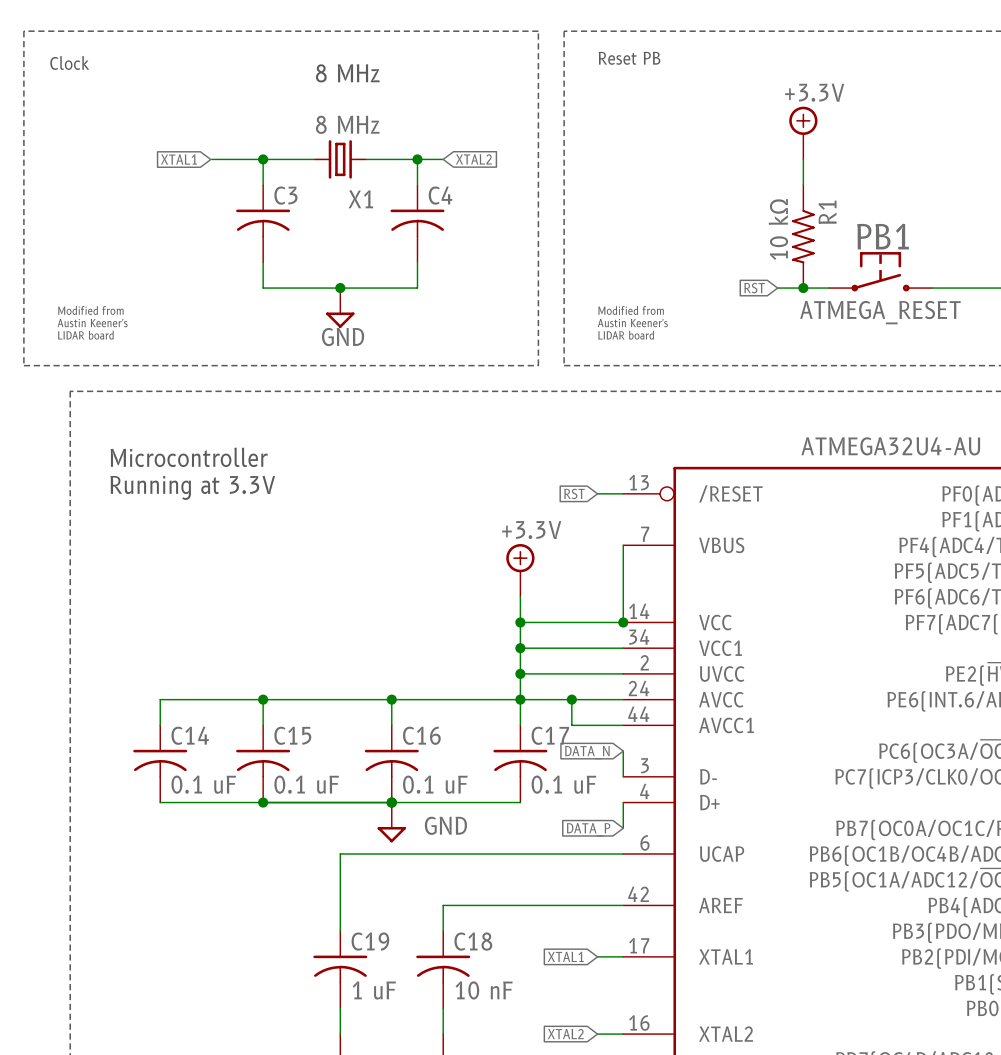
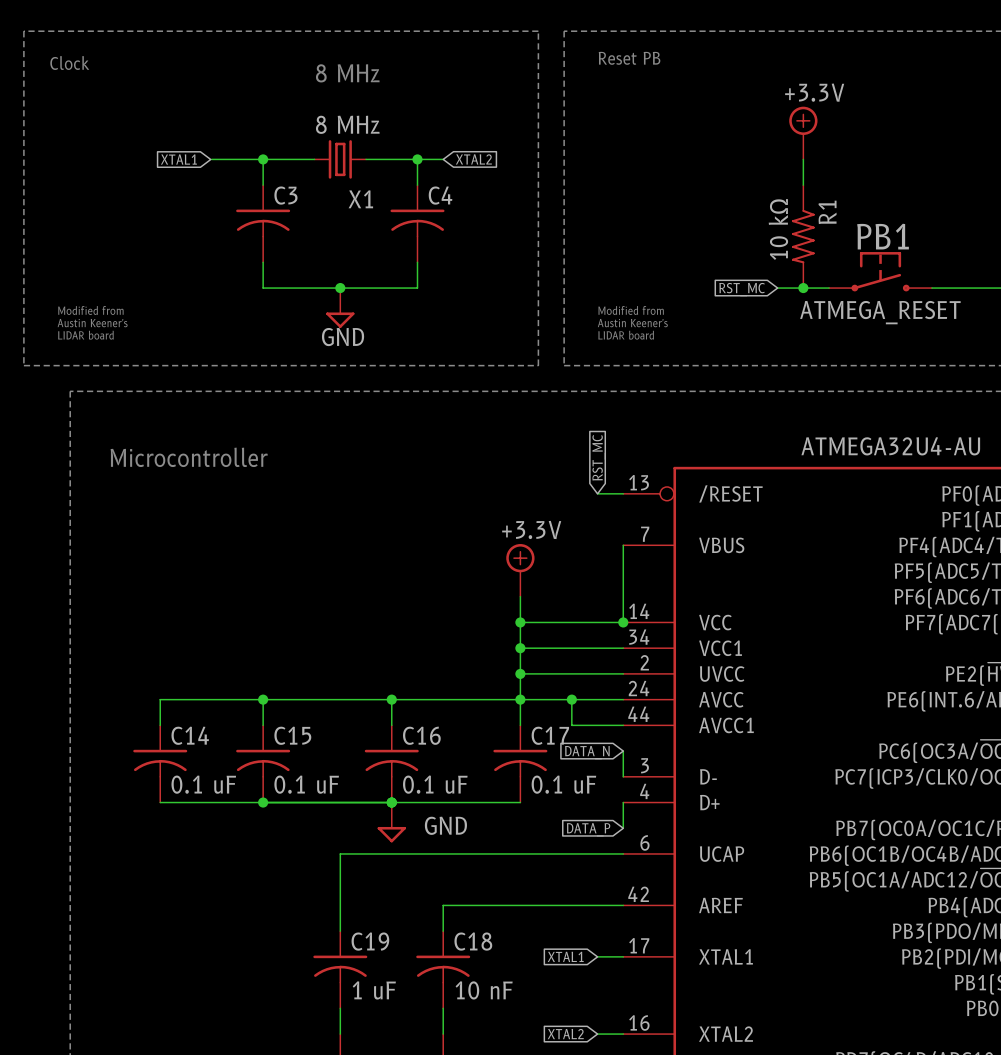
global label: RST (754, 288) -> RST_MC (742, 289)
text: Running at 3.3V (192, 487) -> none
global label: RST (574, 493) -> RST_MC (599, 457)

